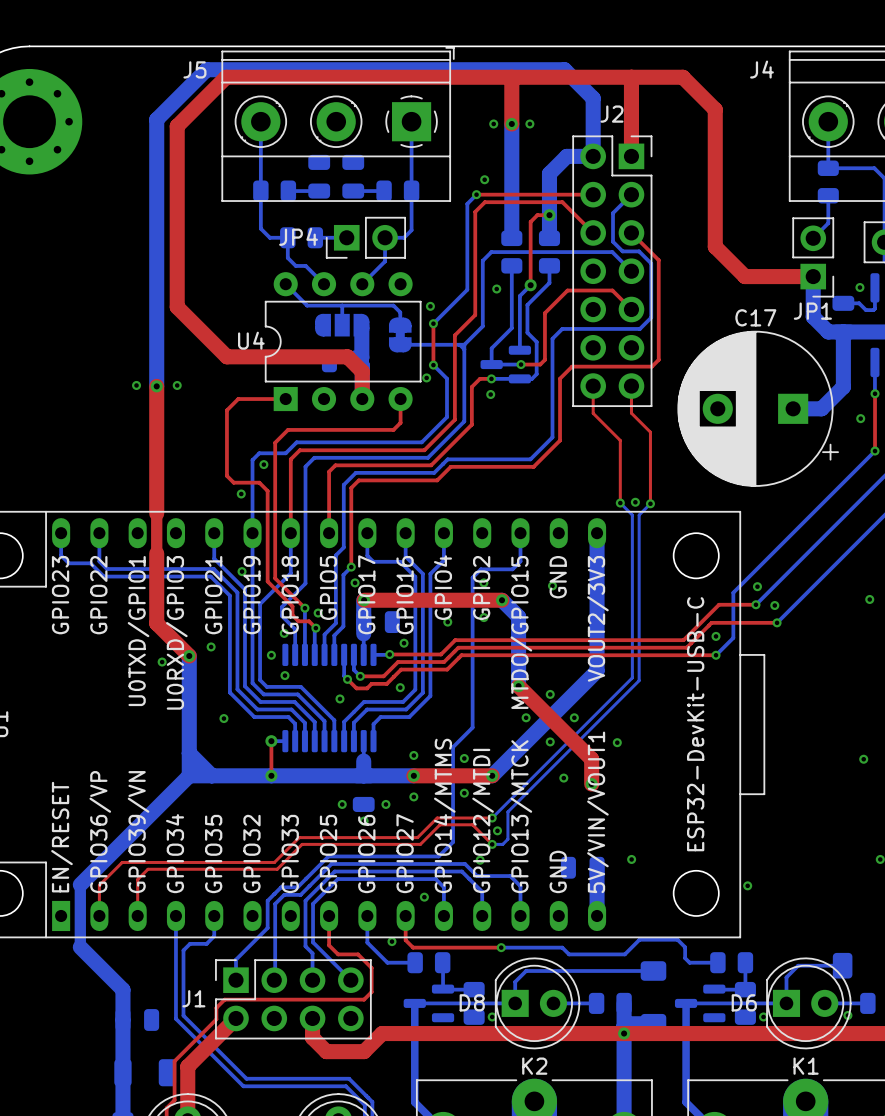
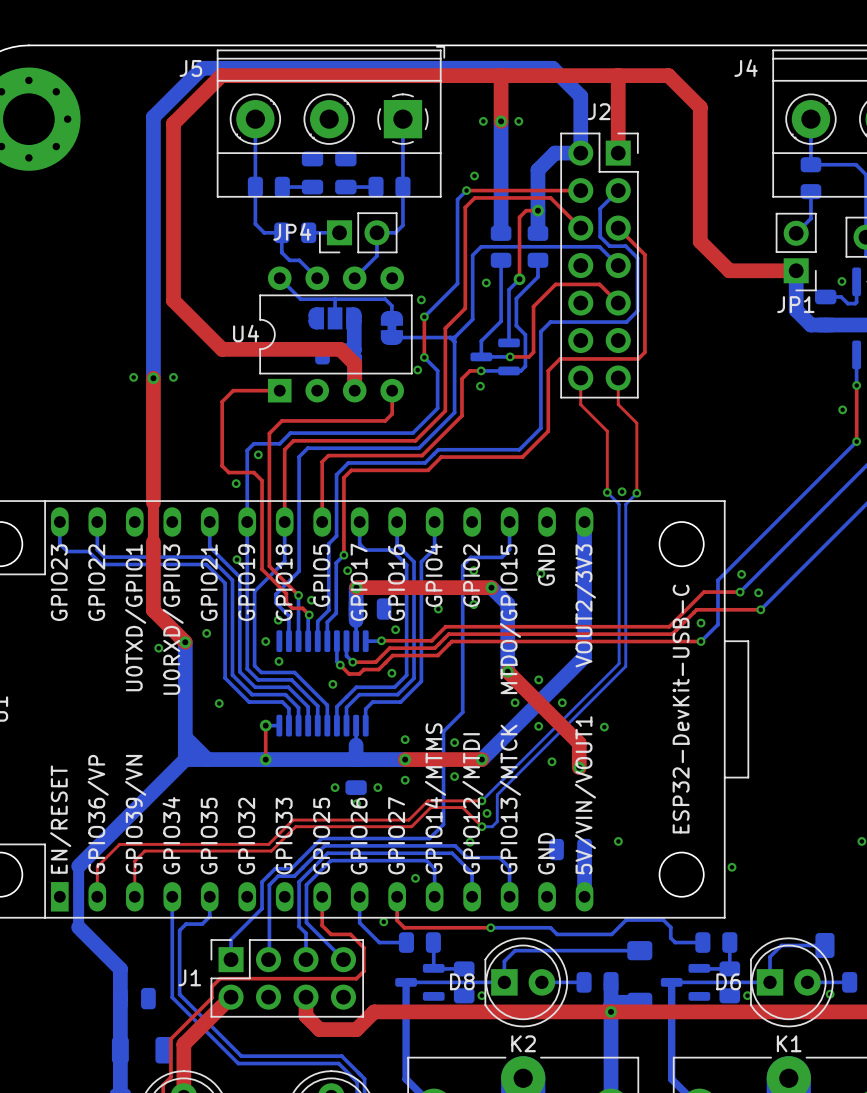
bottom track: (843, 331) (843, 386) (821, 408) (793, 408) -> none
C17: (758, 408) -> none
via: (869, 599) -> none
via: (863, 759) -> none

